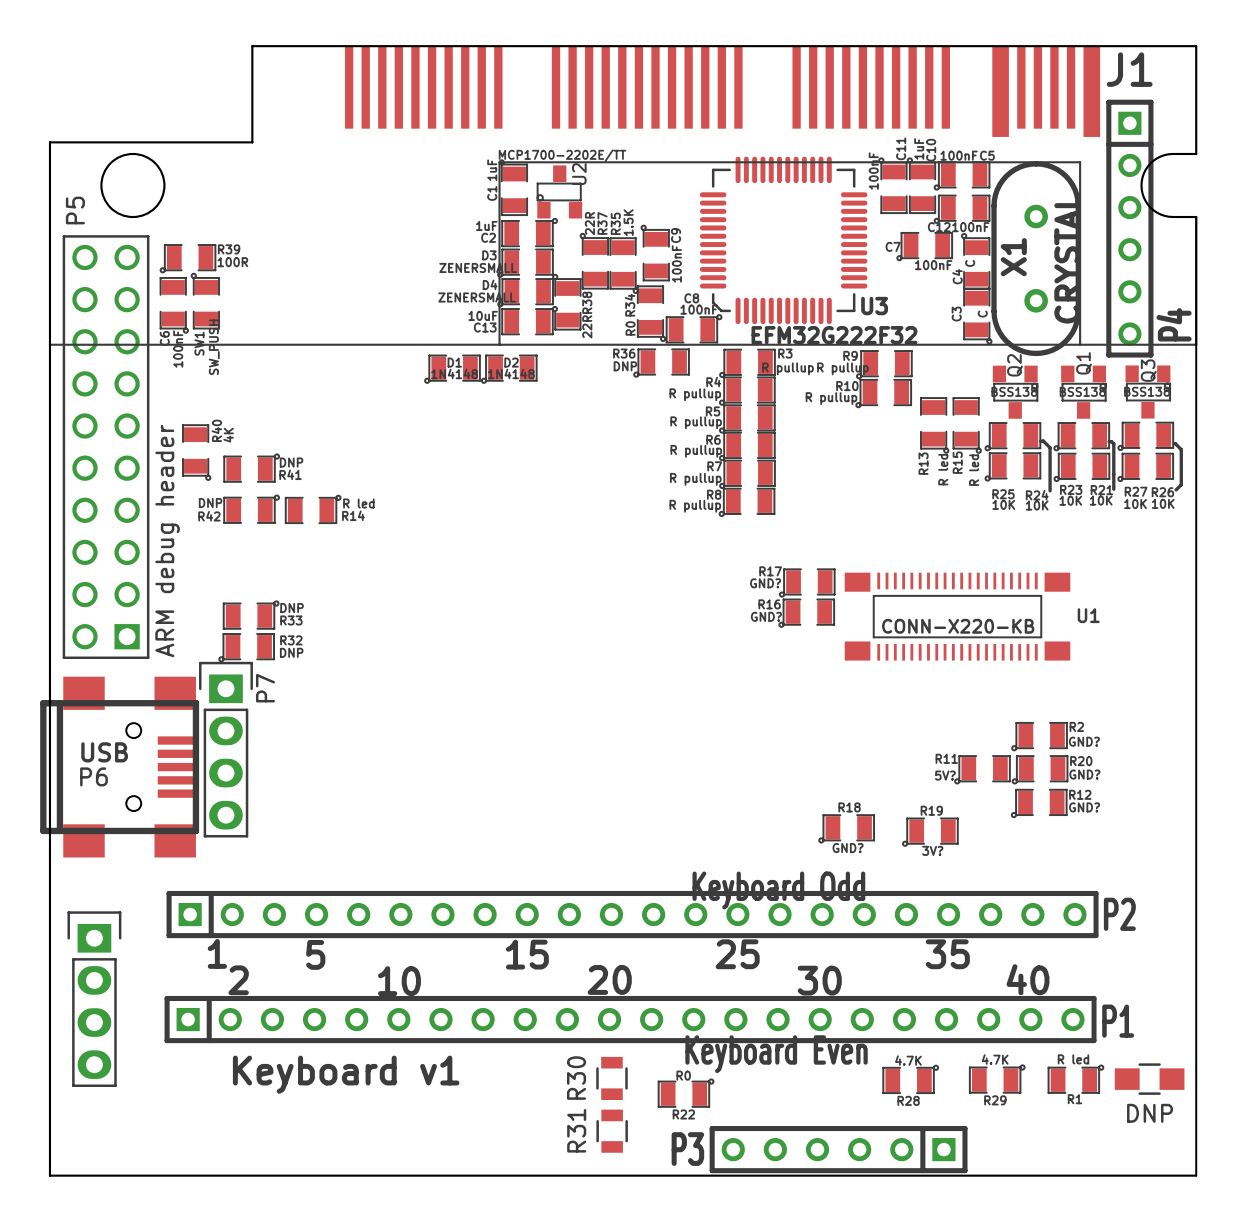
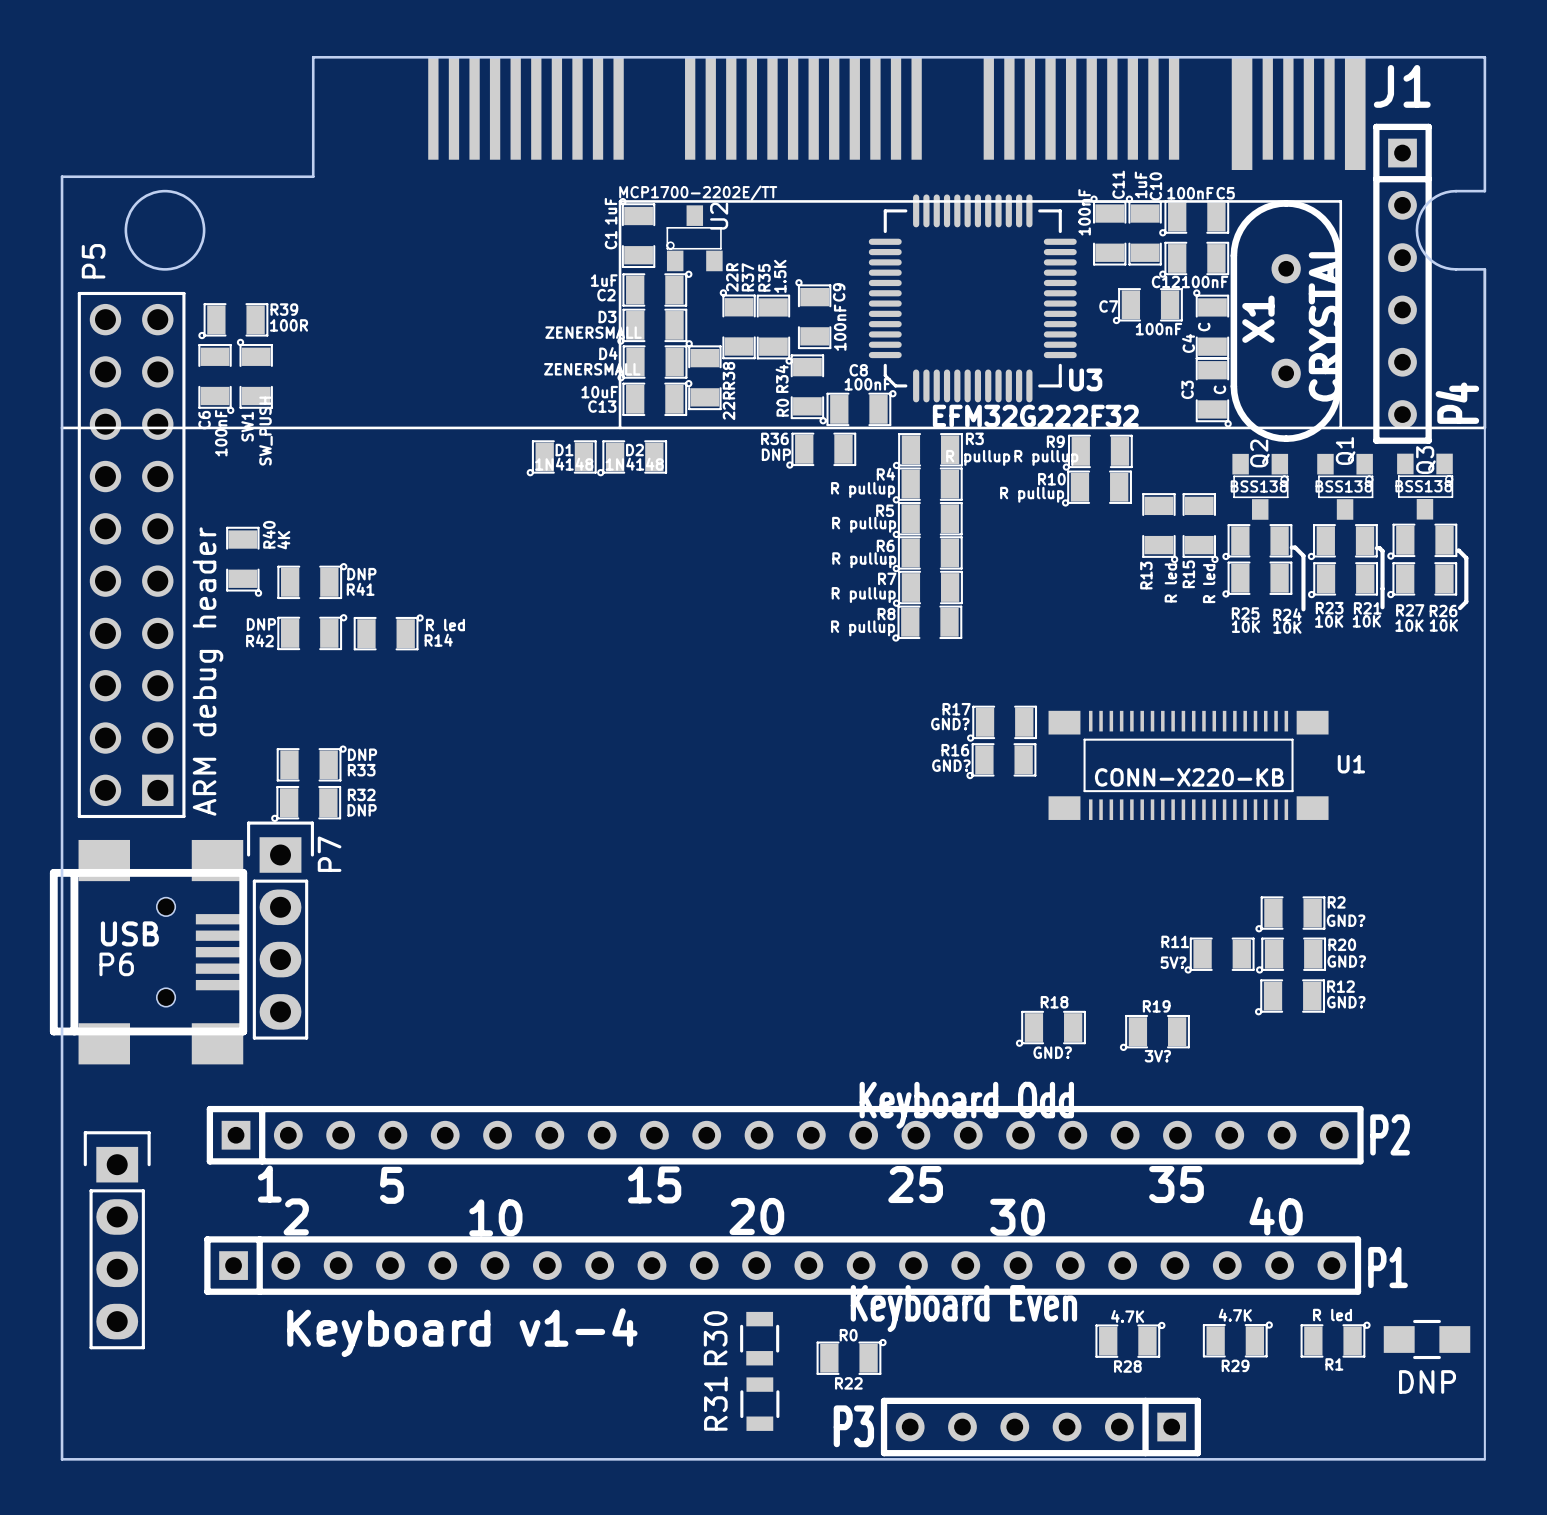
text: Keyboard v1 (346, 1074) -> Keyboard v1-4 (462, 1332)

